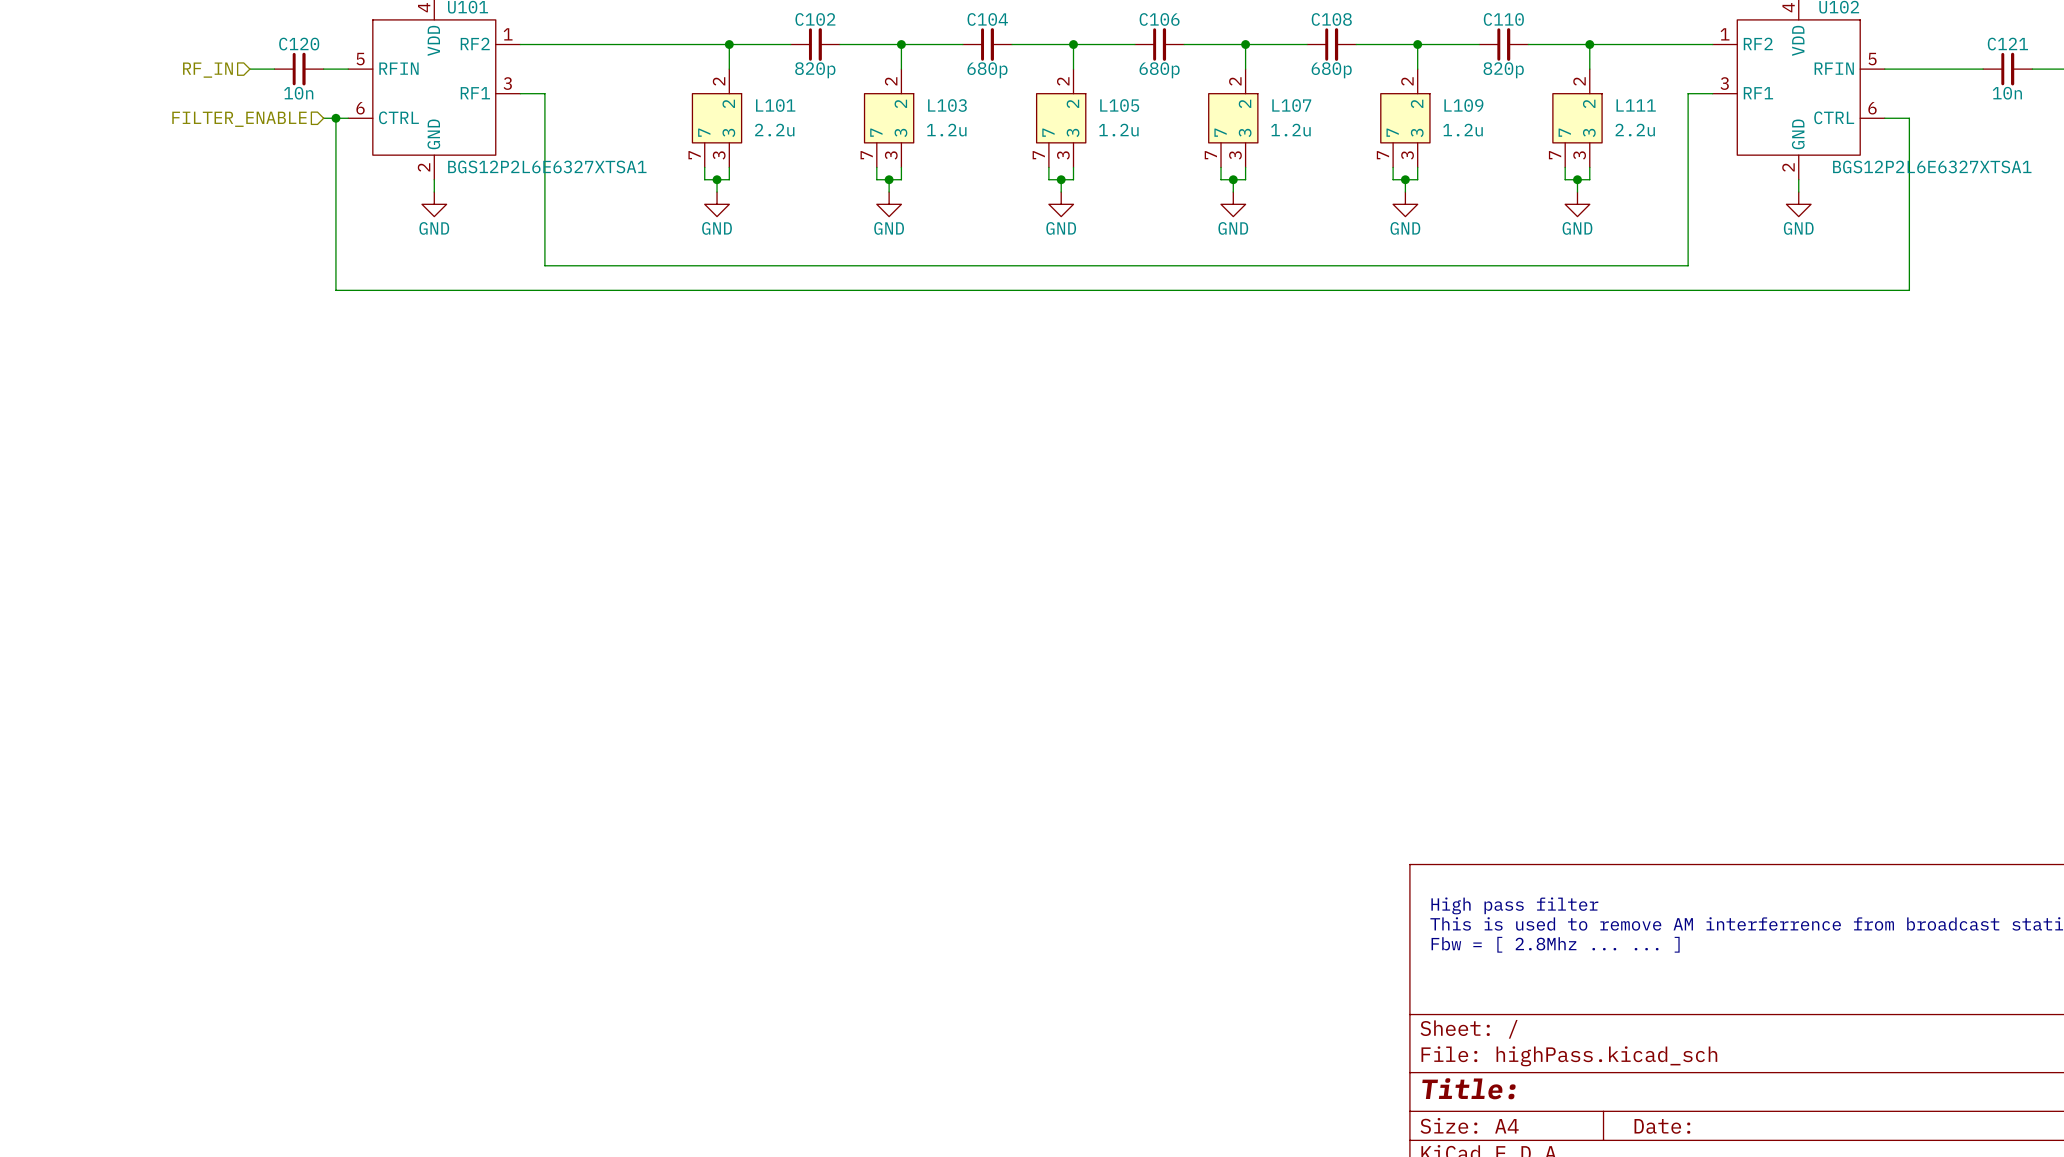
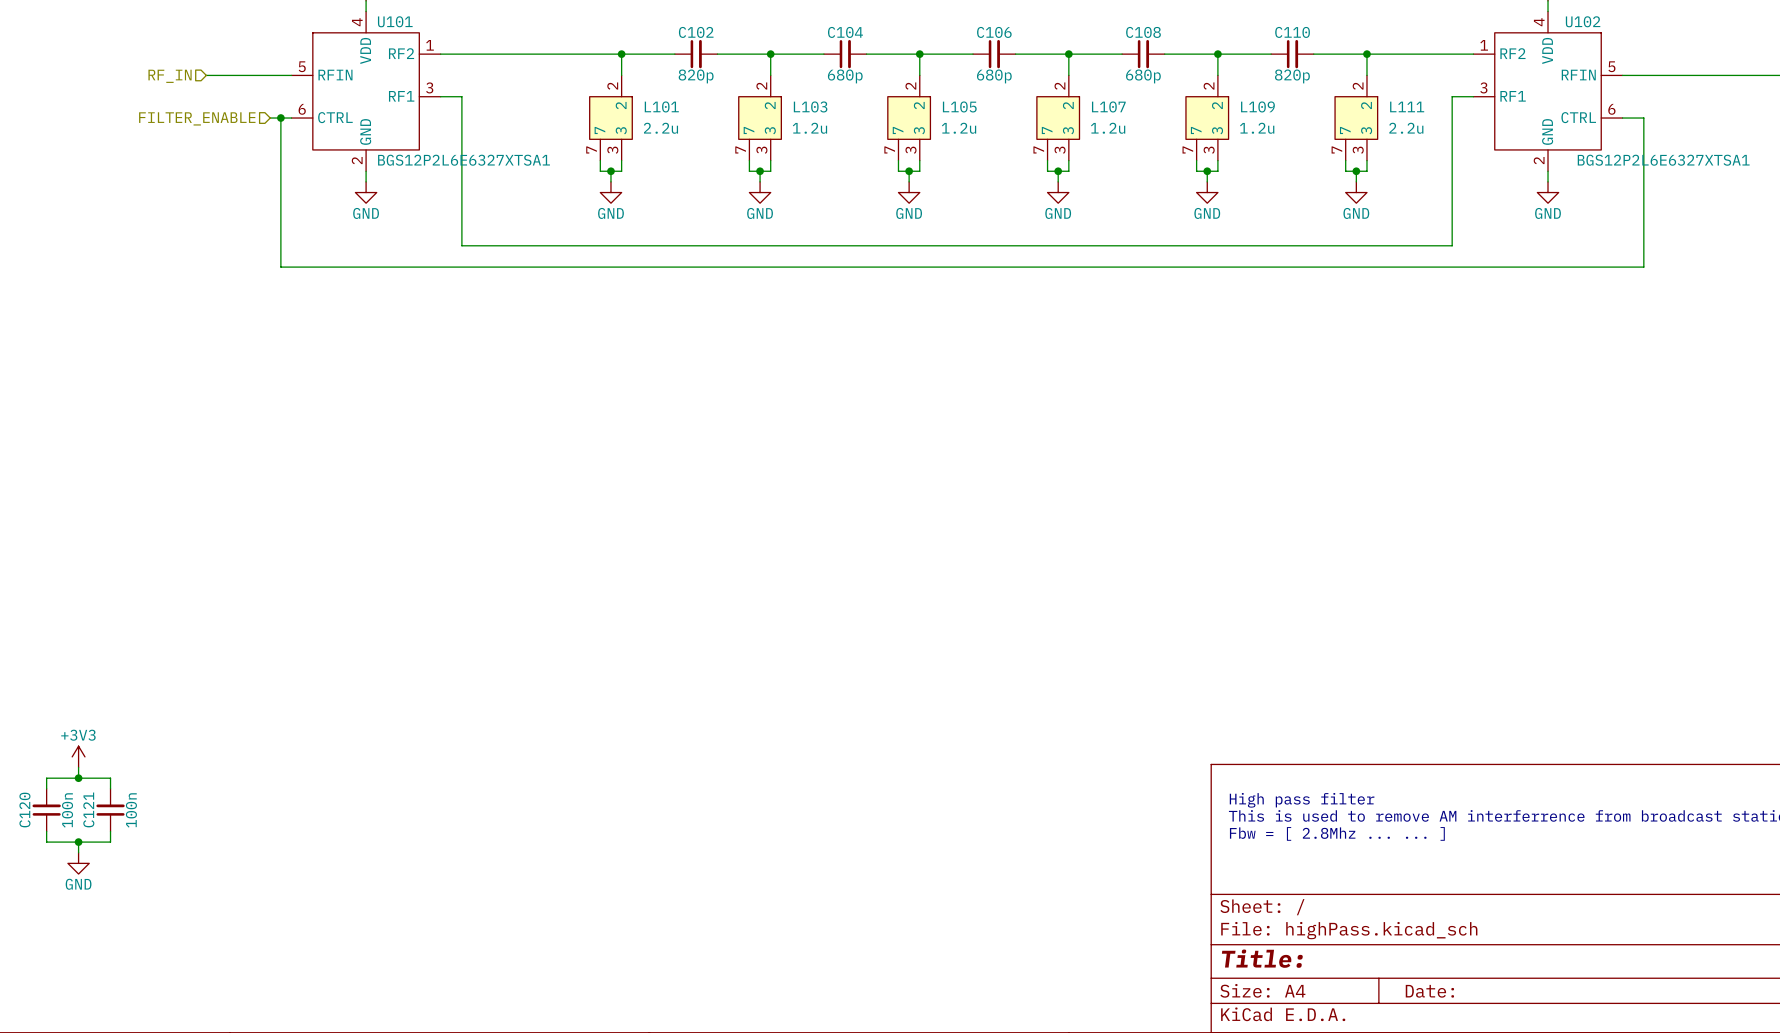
C120 rotation: 0° (299, 69) -> 90° counterclockwise (46, 810)
C120 position: (299, 69) -> (46, 810)
C121 rotation: 0° (2007, 69) -> 90° counterclockwise (110, 810)
C121 position: (2007, 69) -> (110, 810)
C120 value: 10n (298, 93) -> 100n (67, 810)
C121 value: 10n (2007, 93) -> 100n (131, 810)
power symbol: none -> +3V3 (78, 756)
wire: none -> (78, 767) (78, 778)
junction: none -> (78, 778)
wire: none -> (46, 788) (46, 778) (110, 778) (110, 788)
wire: none -> (46, 831) (46, 842) (110, 842) (110, 831)
wire: none -> (78, 842) (78, 852)
junction: none -> (78, 842)
power symbol: none -> GND (78, 863)

